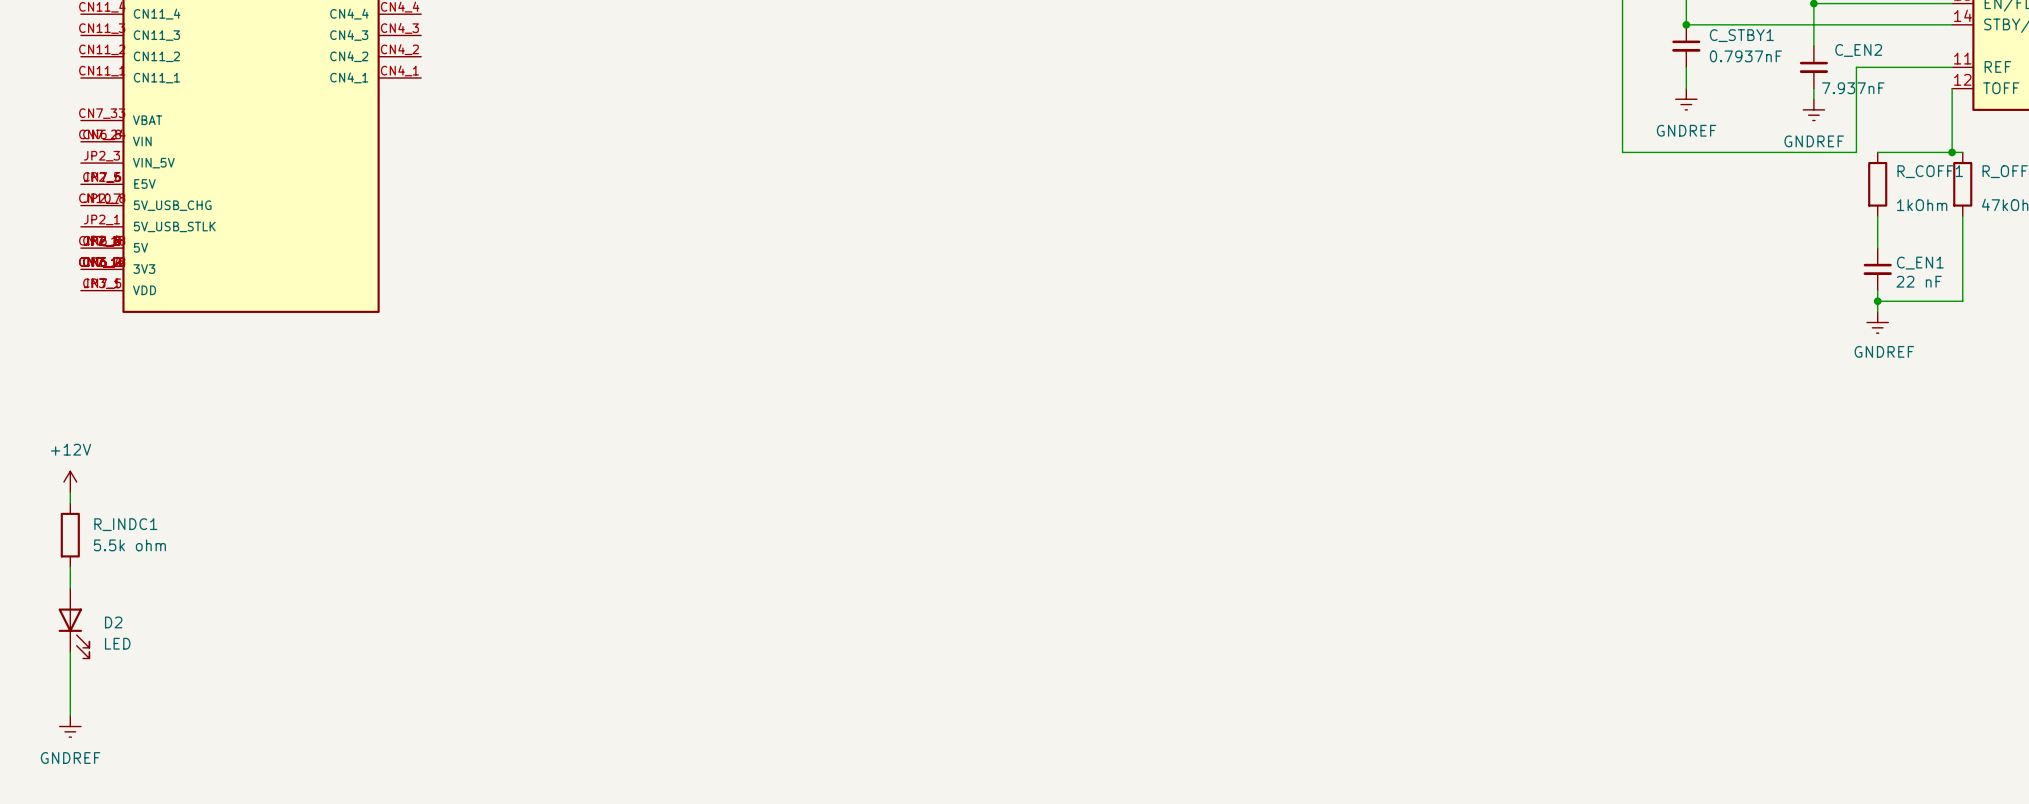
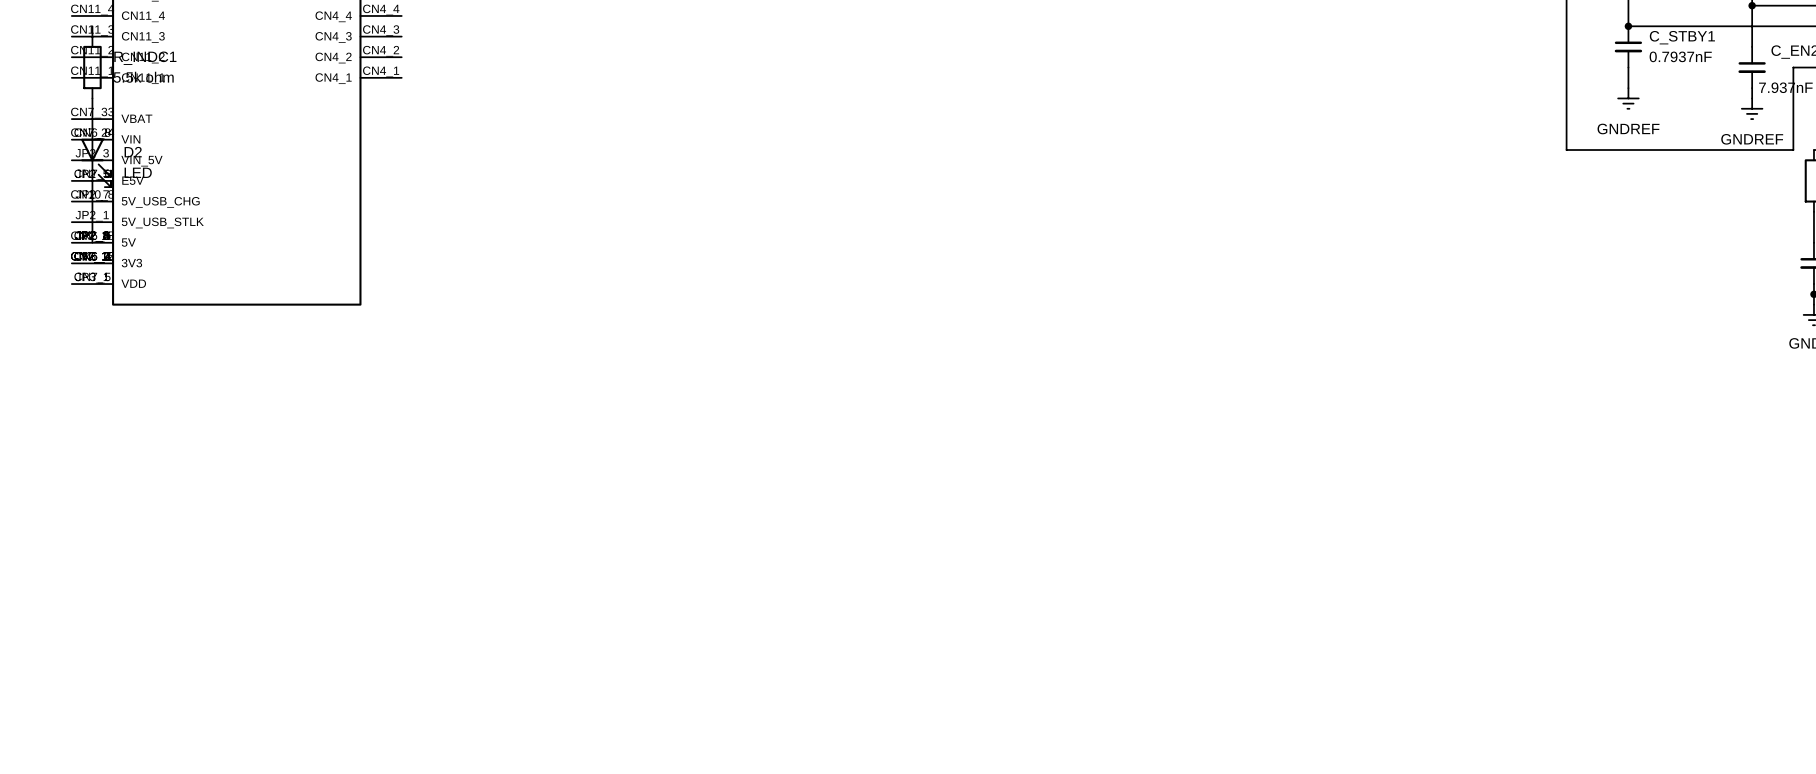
wire: none -> (92, 26) (92, 36)
wire: none -> (92, 98) (92, 119)
wire: none -> (92, 180) (92, 242)
power symbol: +12V (70, 482) -> none
wire: (70, 492) (70, 503) -> none
R_INDC1 position: (70, 535) -> (92, 67)
wire: (70, 567) (70, 588) -> none
D2 position: (74, 623) -> (96, 153)
wire: (70, 652) (70, 715) -> none
power symbol: GNDREF (70, 726) -> none

